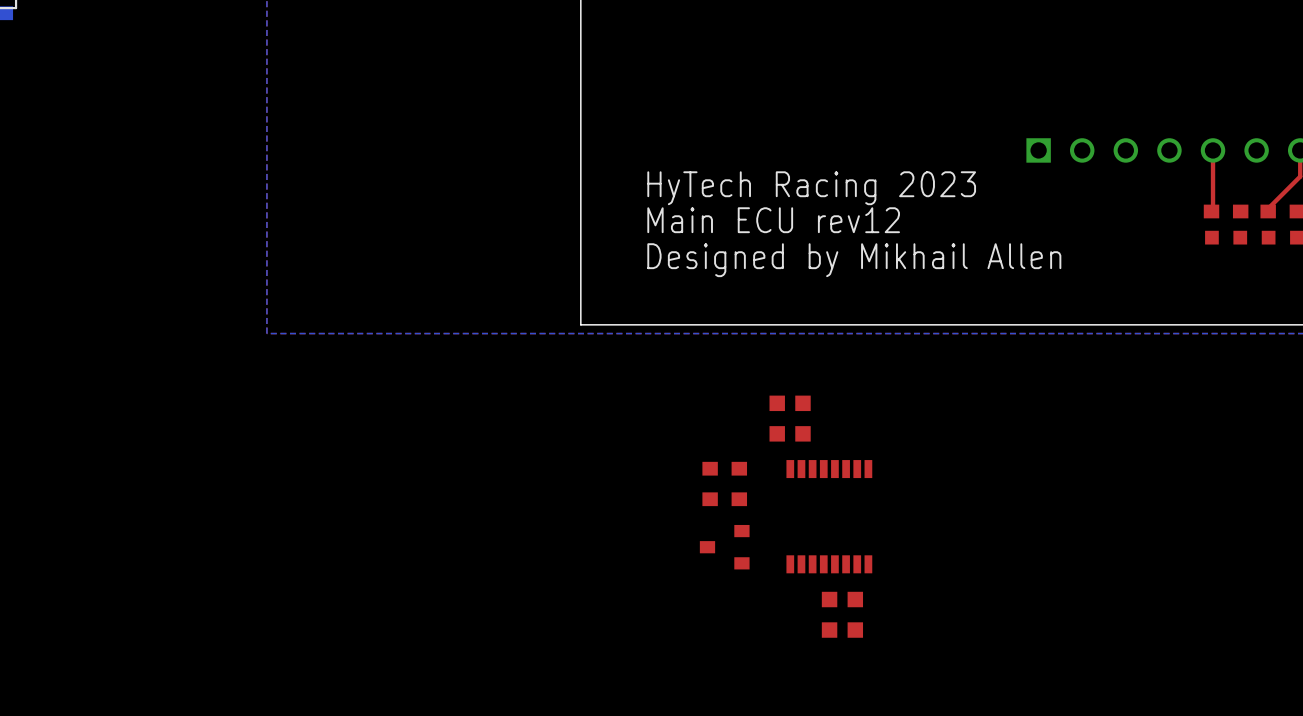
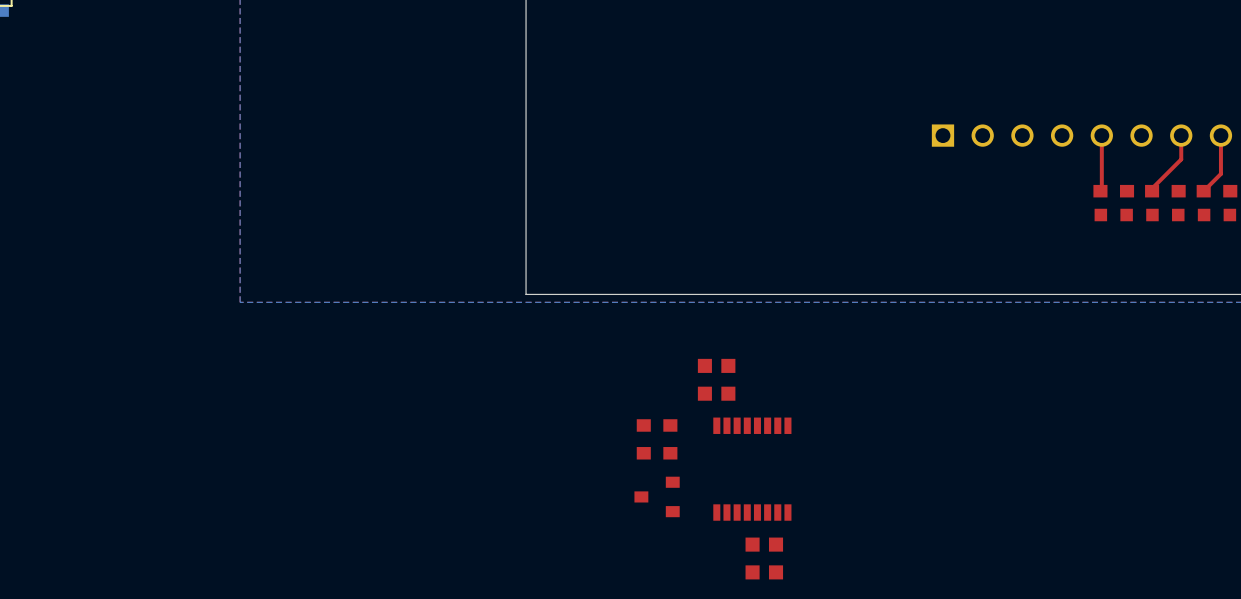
text: HyTech Racing 2023 (811, 188) -> none
text: Main ECU rev12 (773, 220) -> none
text: Designed by Mikhail Allen (854, 260) -> none

